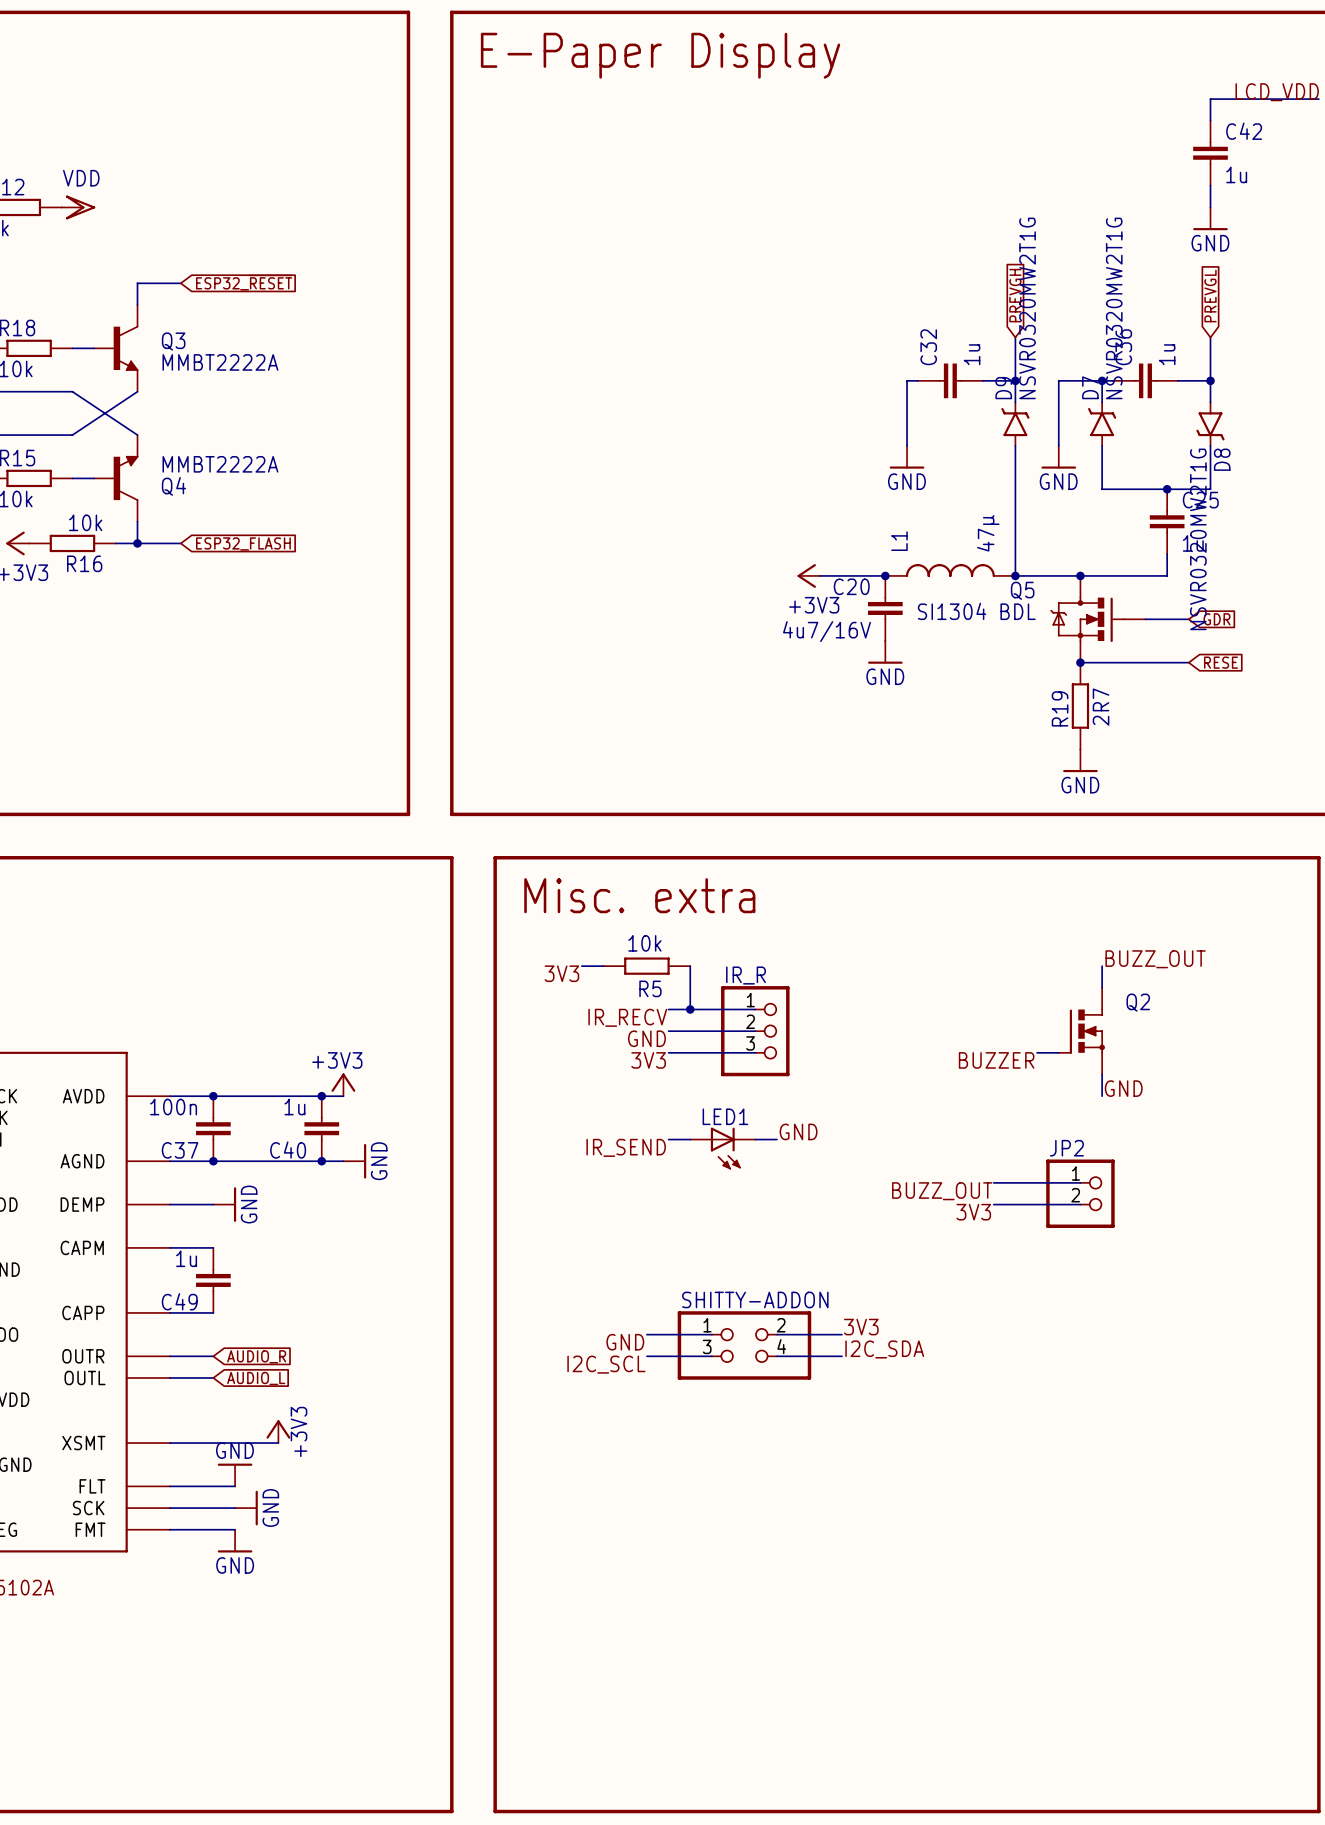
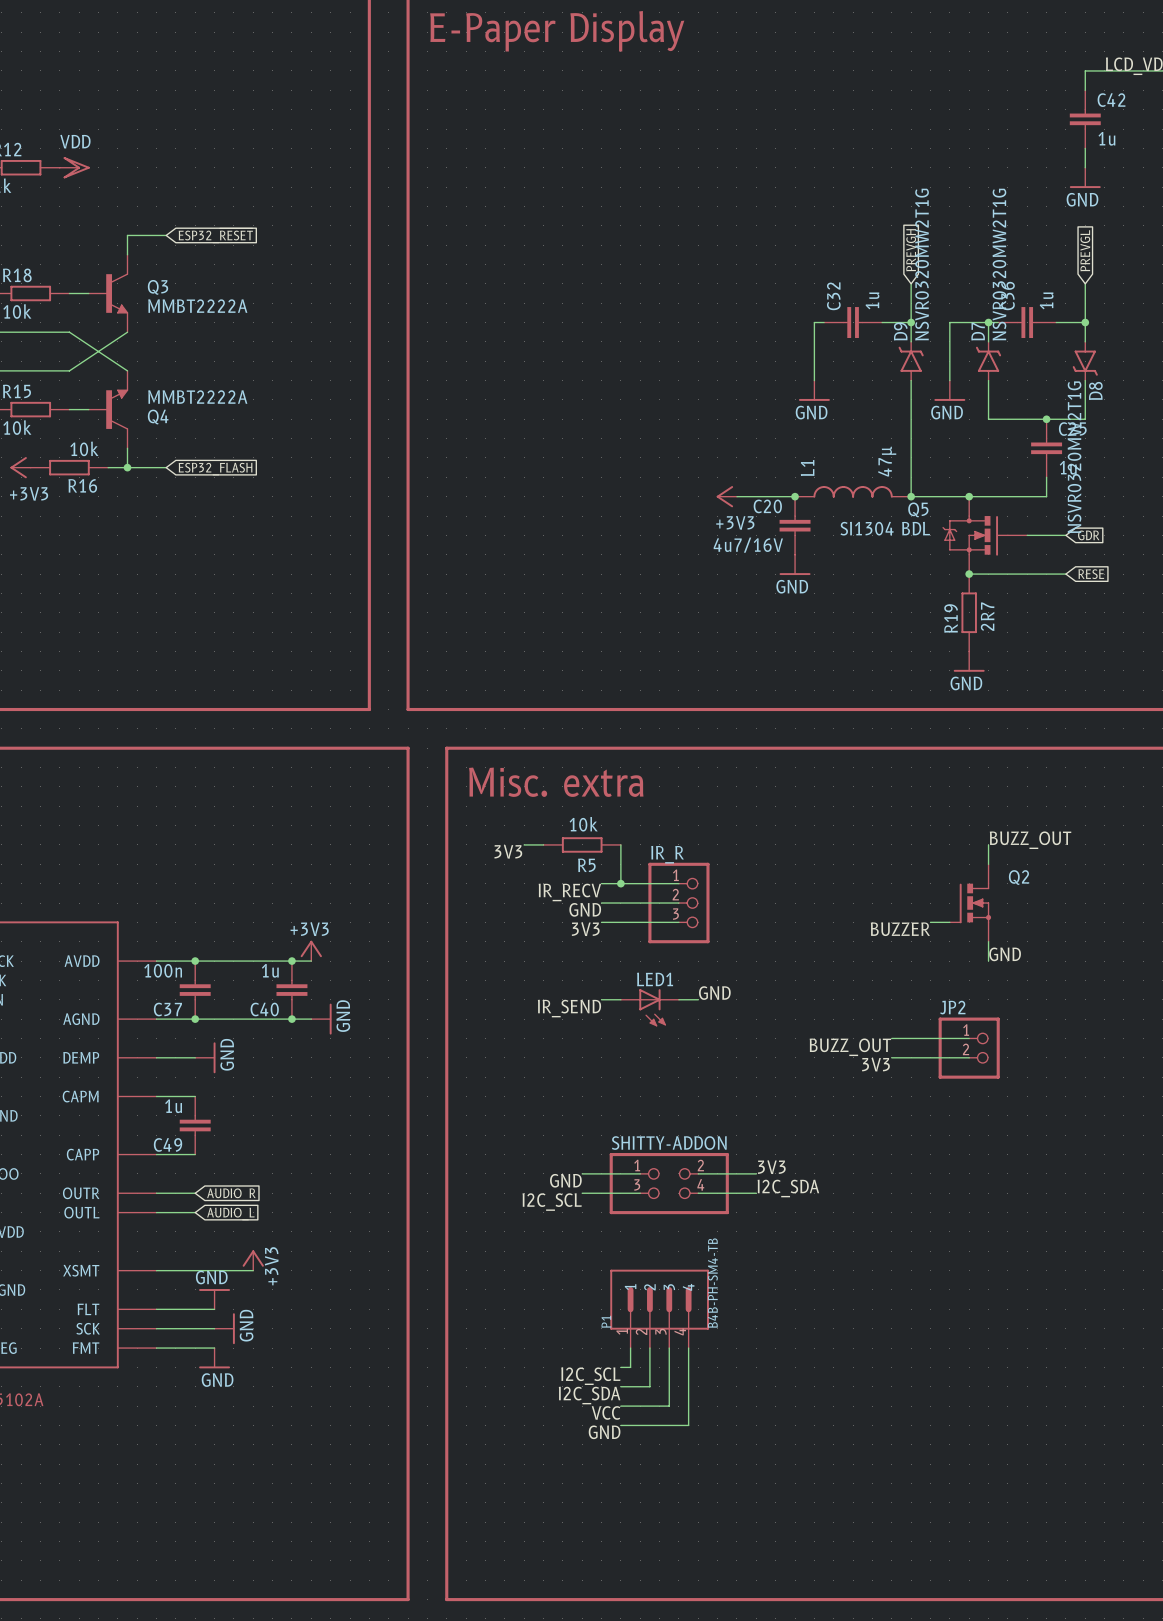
P1: none -> B4B-PH-SM4-TB (659, 1308)
wire: none -> (630, 1348) (630, 1367) (620, 1367)
wire: none -> (649, 1348) (649, 1386) (620, 1386)
wire: none -> (669, 1348) (669, 1406) (620, 1406)
wire: none -> (688, 1348) (688, 1425) (620, 1425)
label: none -> I2C_SCL (590, 1376)
label: none -> I2C_SDA (589, 1395)
label: none -> VCC (606, 1412)
label: none -> GND (604, 1432)

